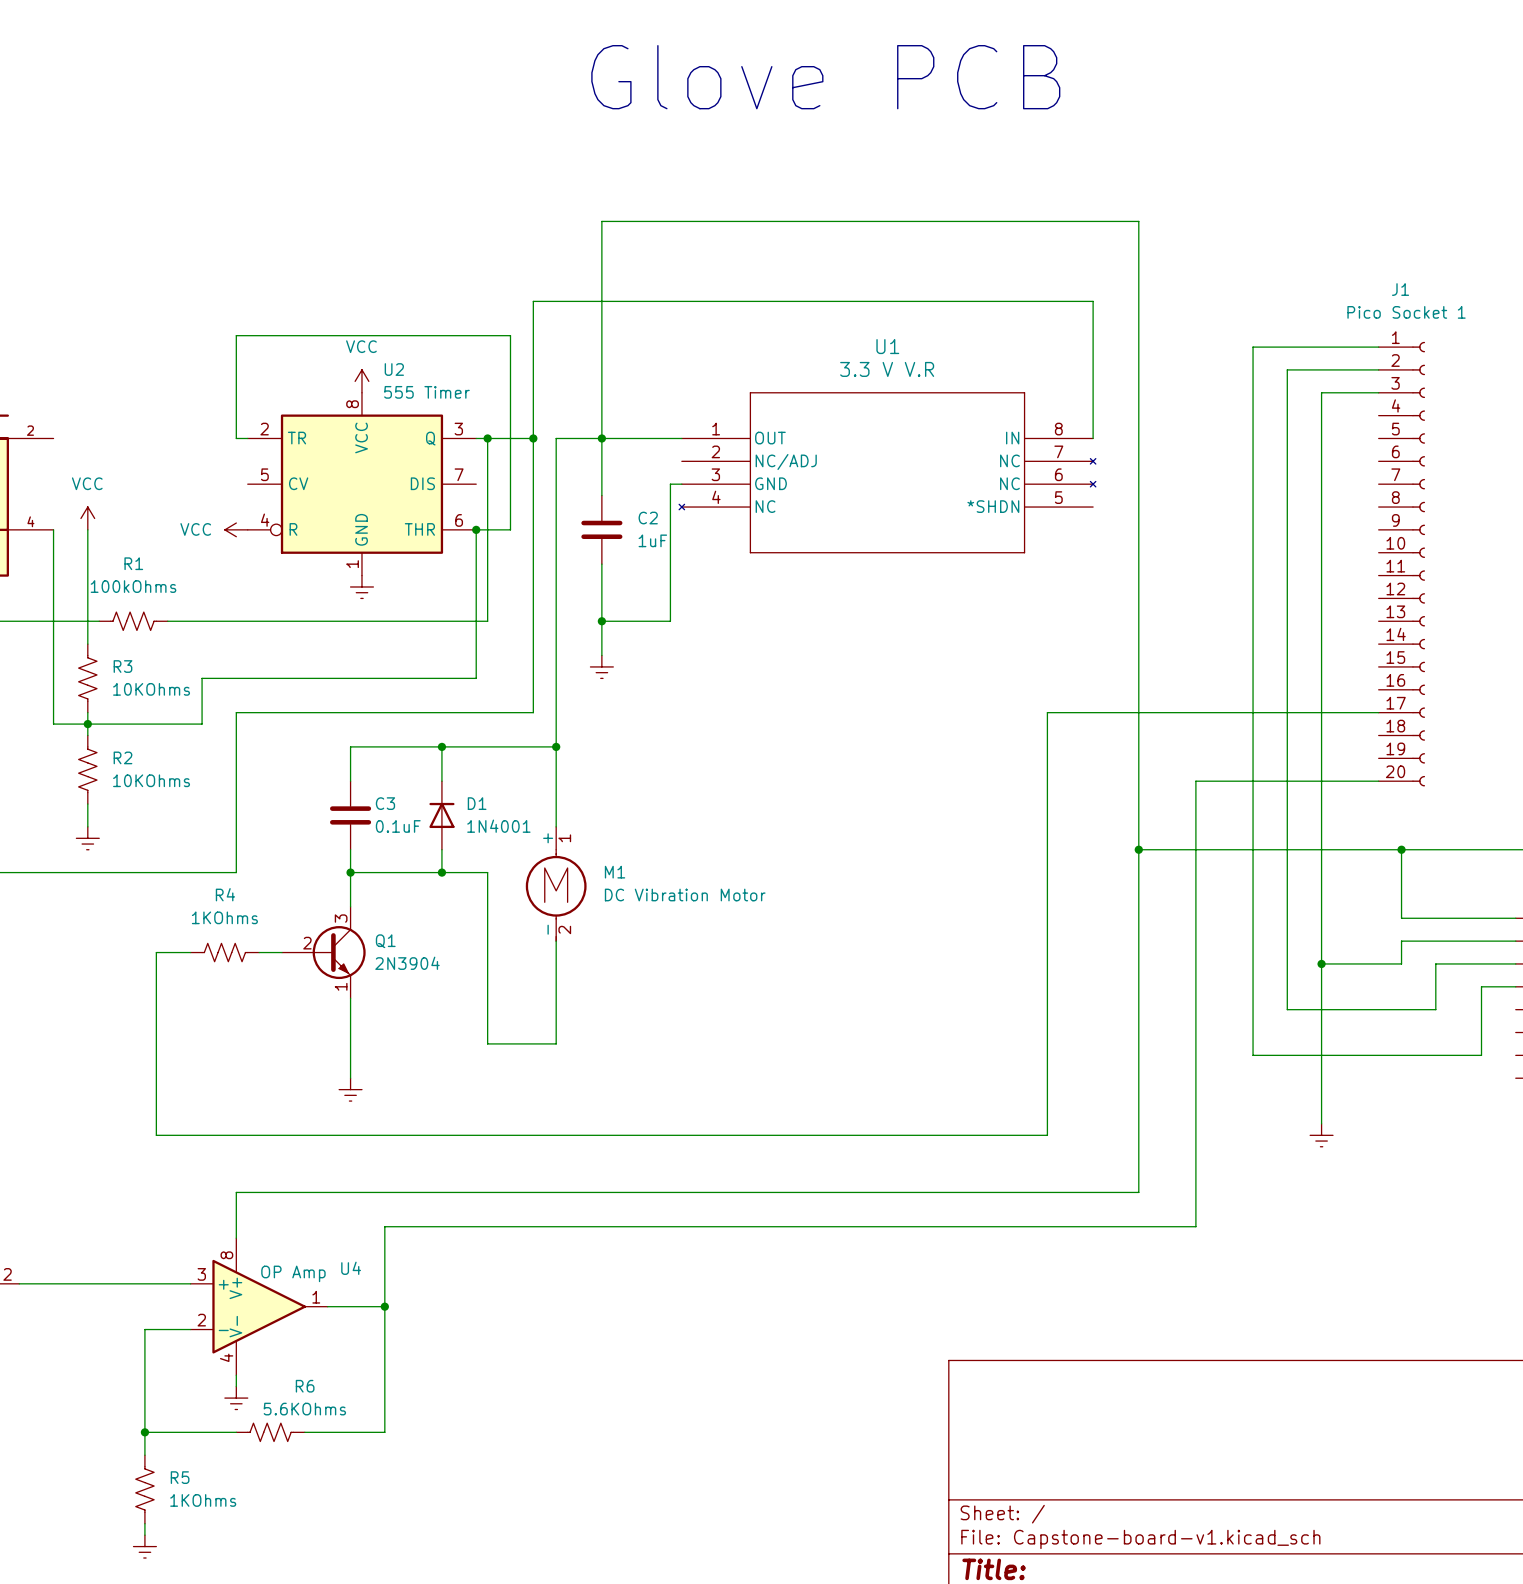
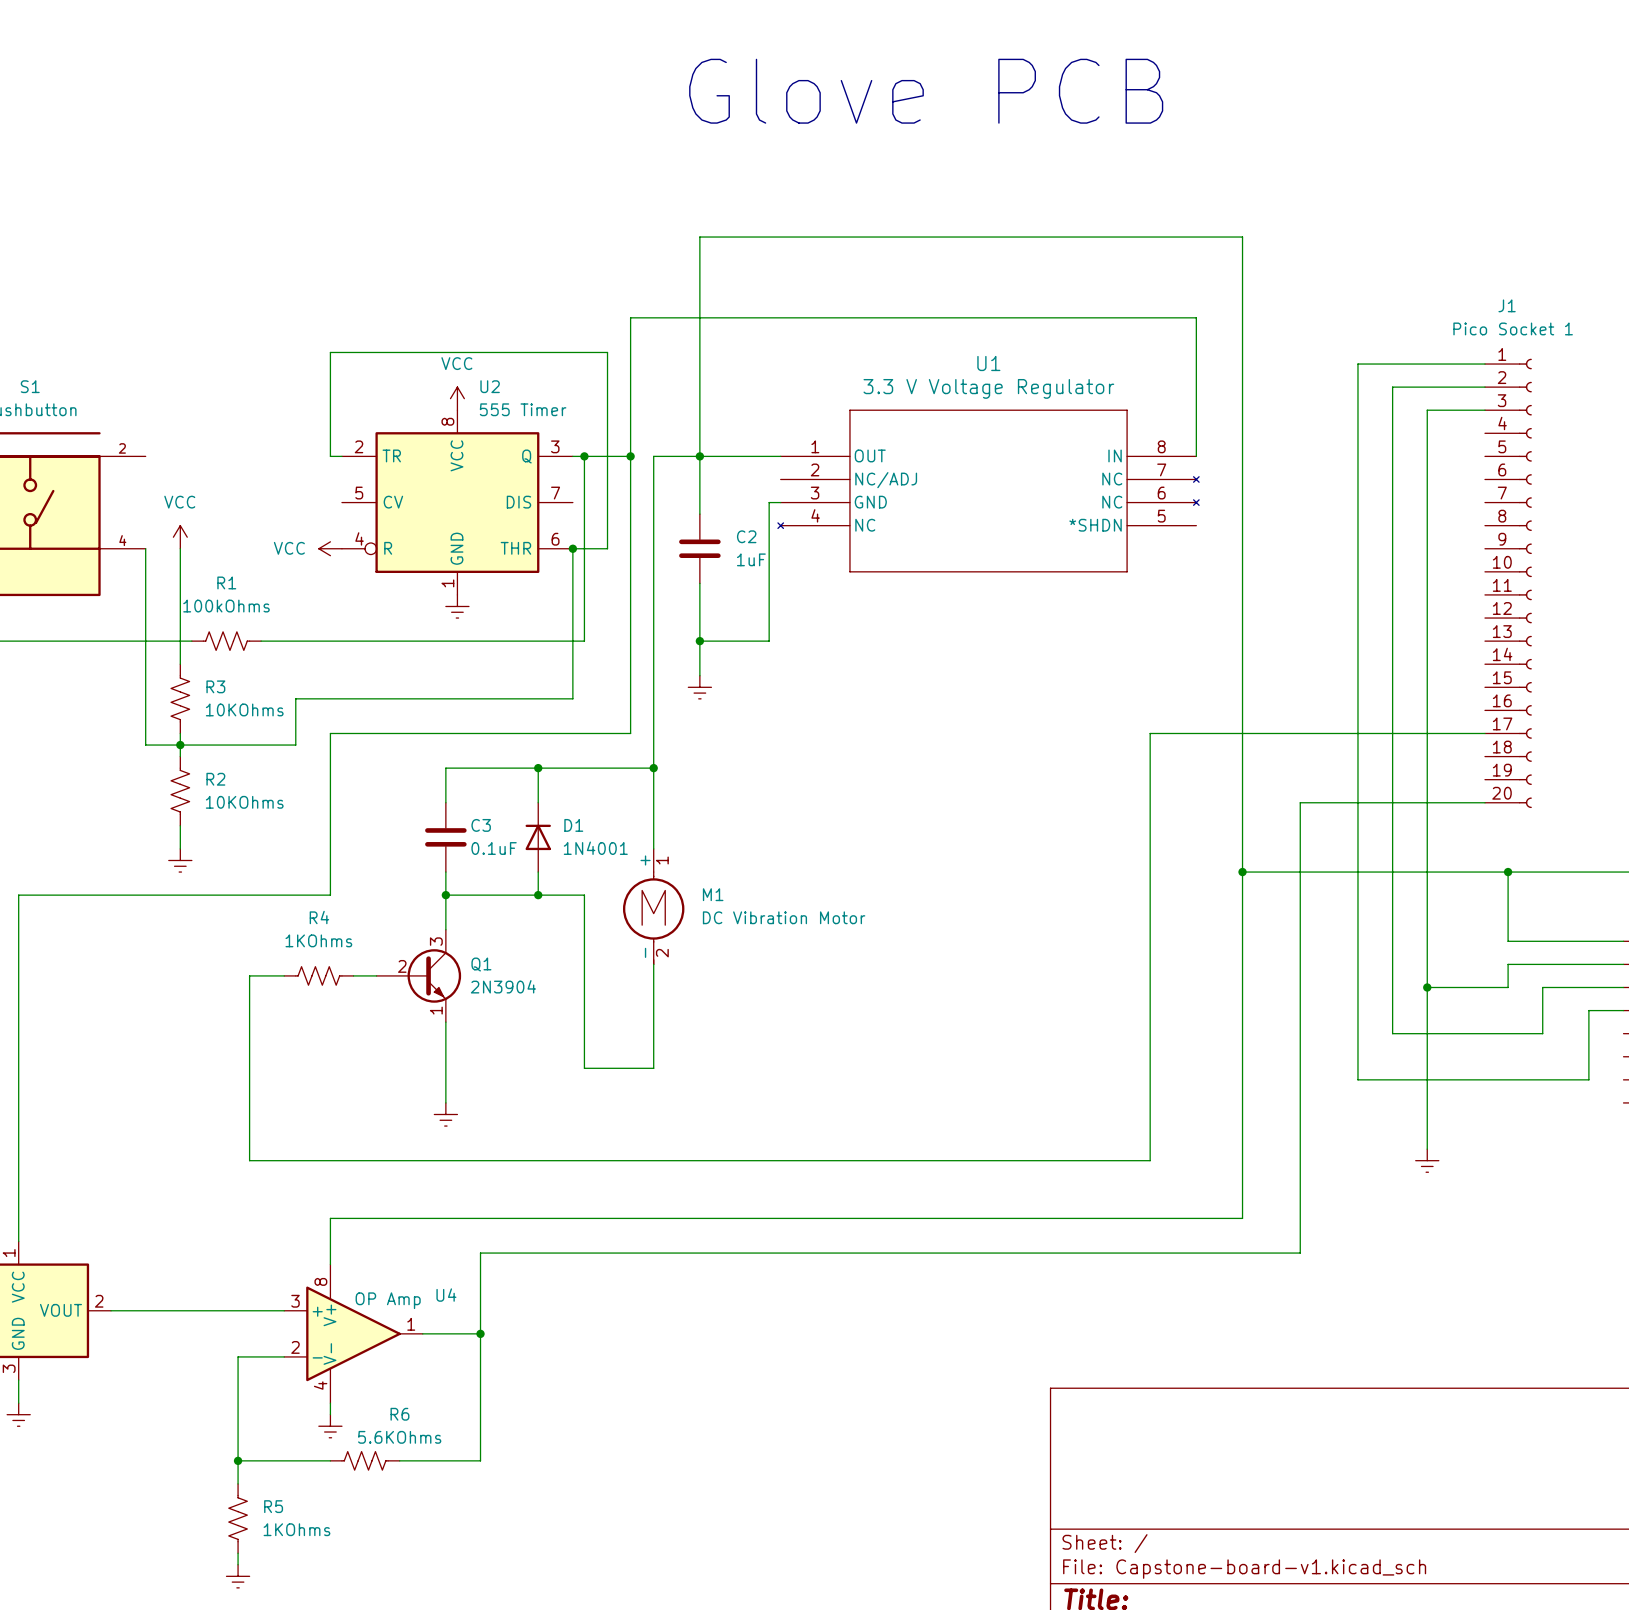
U1 value: 3.3 V V.R (887, 369) -> 3.3 V Voltage Regulator (988, 388)

